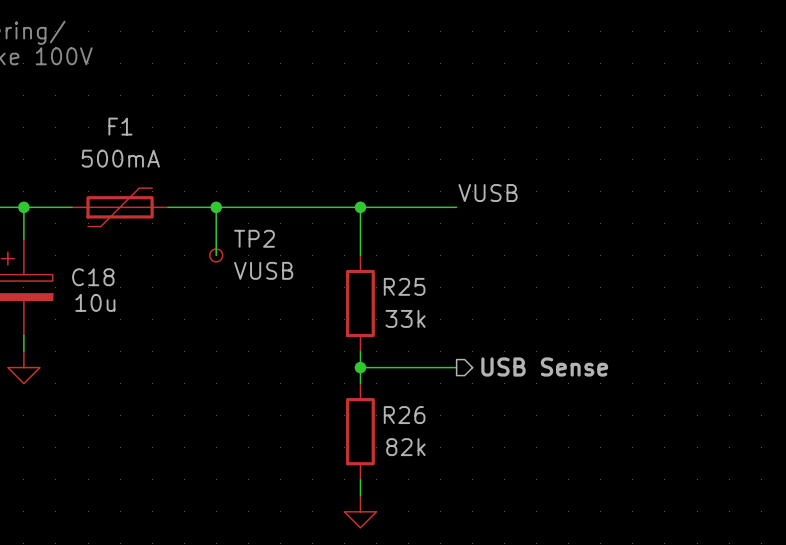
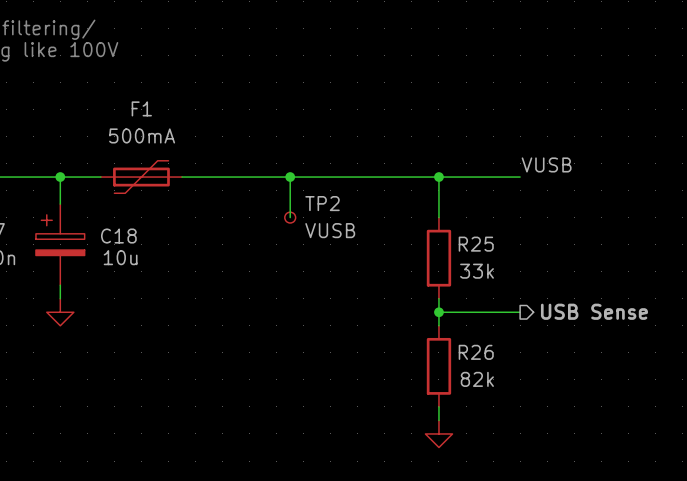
label position: VUSB (488, 193) -> VUSB (546, 164)
wire: (216, 207) (216, 255) -> (290, 177) (290, 217)
junction: (216, 207) -> none
junction: none -> (290, 177)
wire: (360, 207) (360, 255) -> (438, 177) (438, 217)
junction: (360, 207) -> none
wire: none -> (425, 177) (520, 177)
junction: none -> (438, 177)
TP2 position: (216, 255) -> (290, 217)
R25 position: (360, 303) -> (438, 258)
wire: (360, 351) (360, 383) -> (438, 298) (438, 325)
hierarchical label position: USB Sense (544, 366) -> USB Sense (594, 311)
wire: (360, 367) (456, 367) -> (438, 312) (520, 312)
junction: (360, 367) -> none
junction: none -> (438, 312)
R26 position: (360, 431) -> (438, 366)
wire: (360, 479) (360, 495) -> (438, 406) (438, 420)
power symbol position: (360, 511) -> (438, 433)

